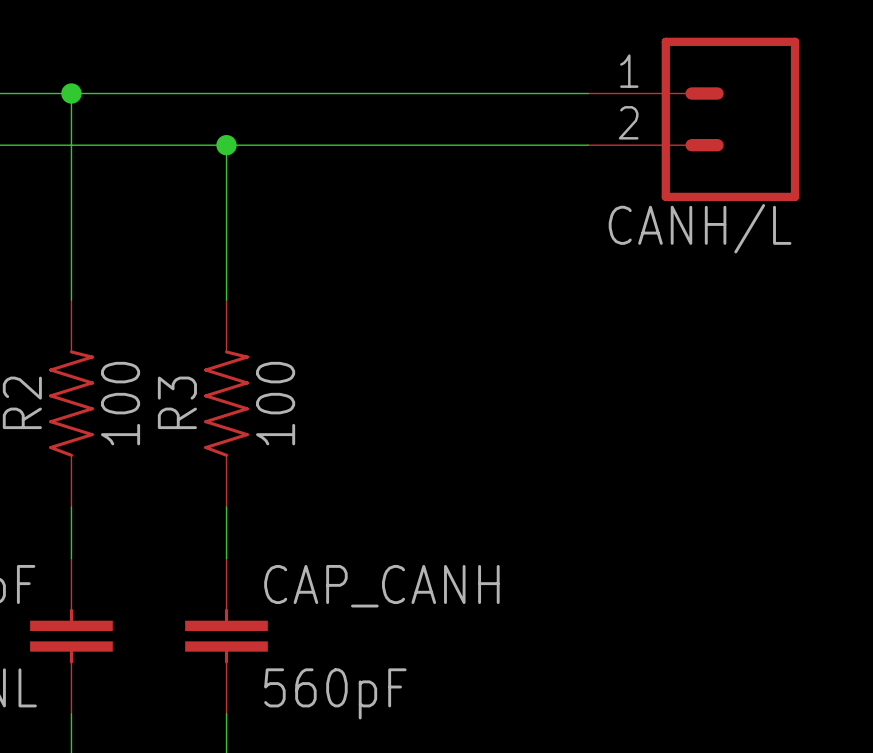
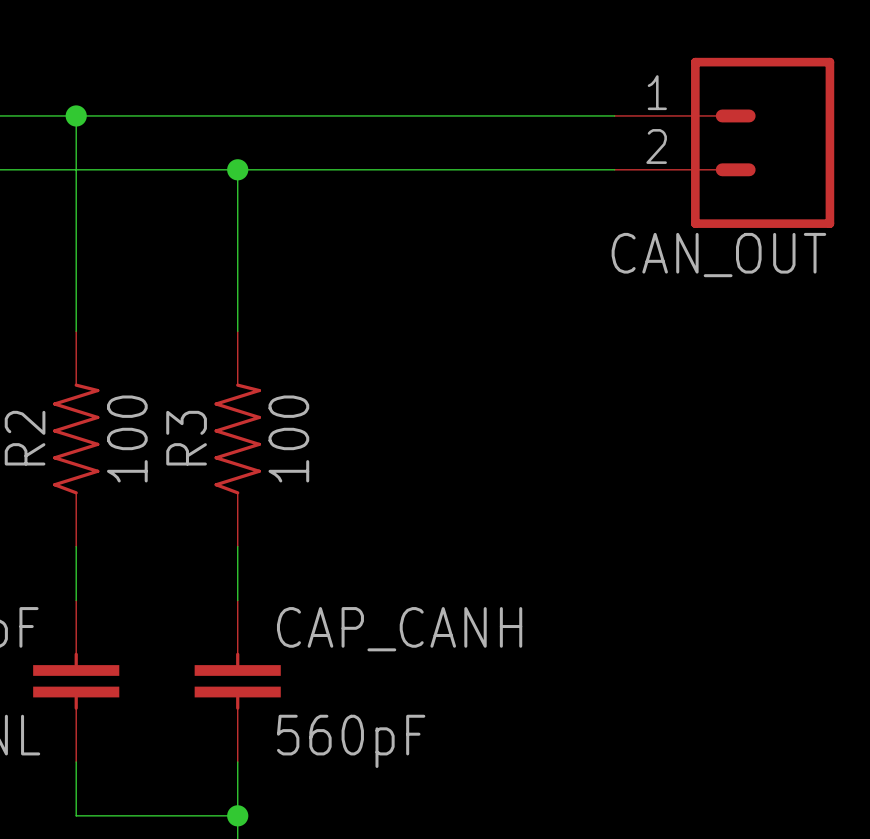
CANH/L name: CANH/L (700, 228) -> CAN_OUT (718, 255)

